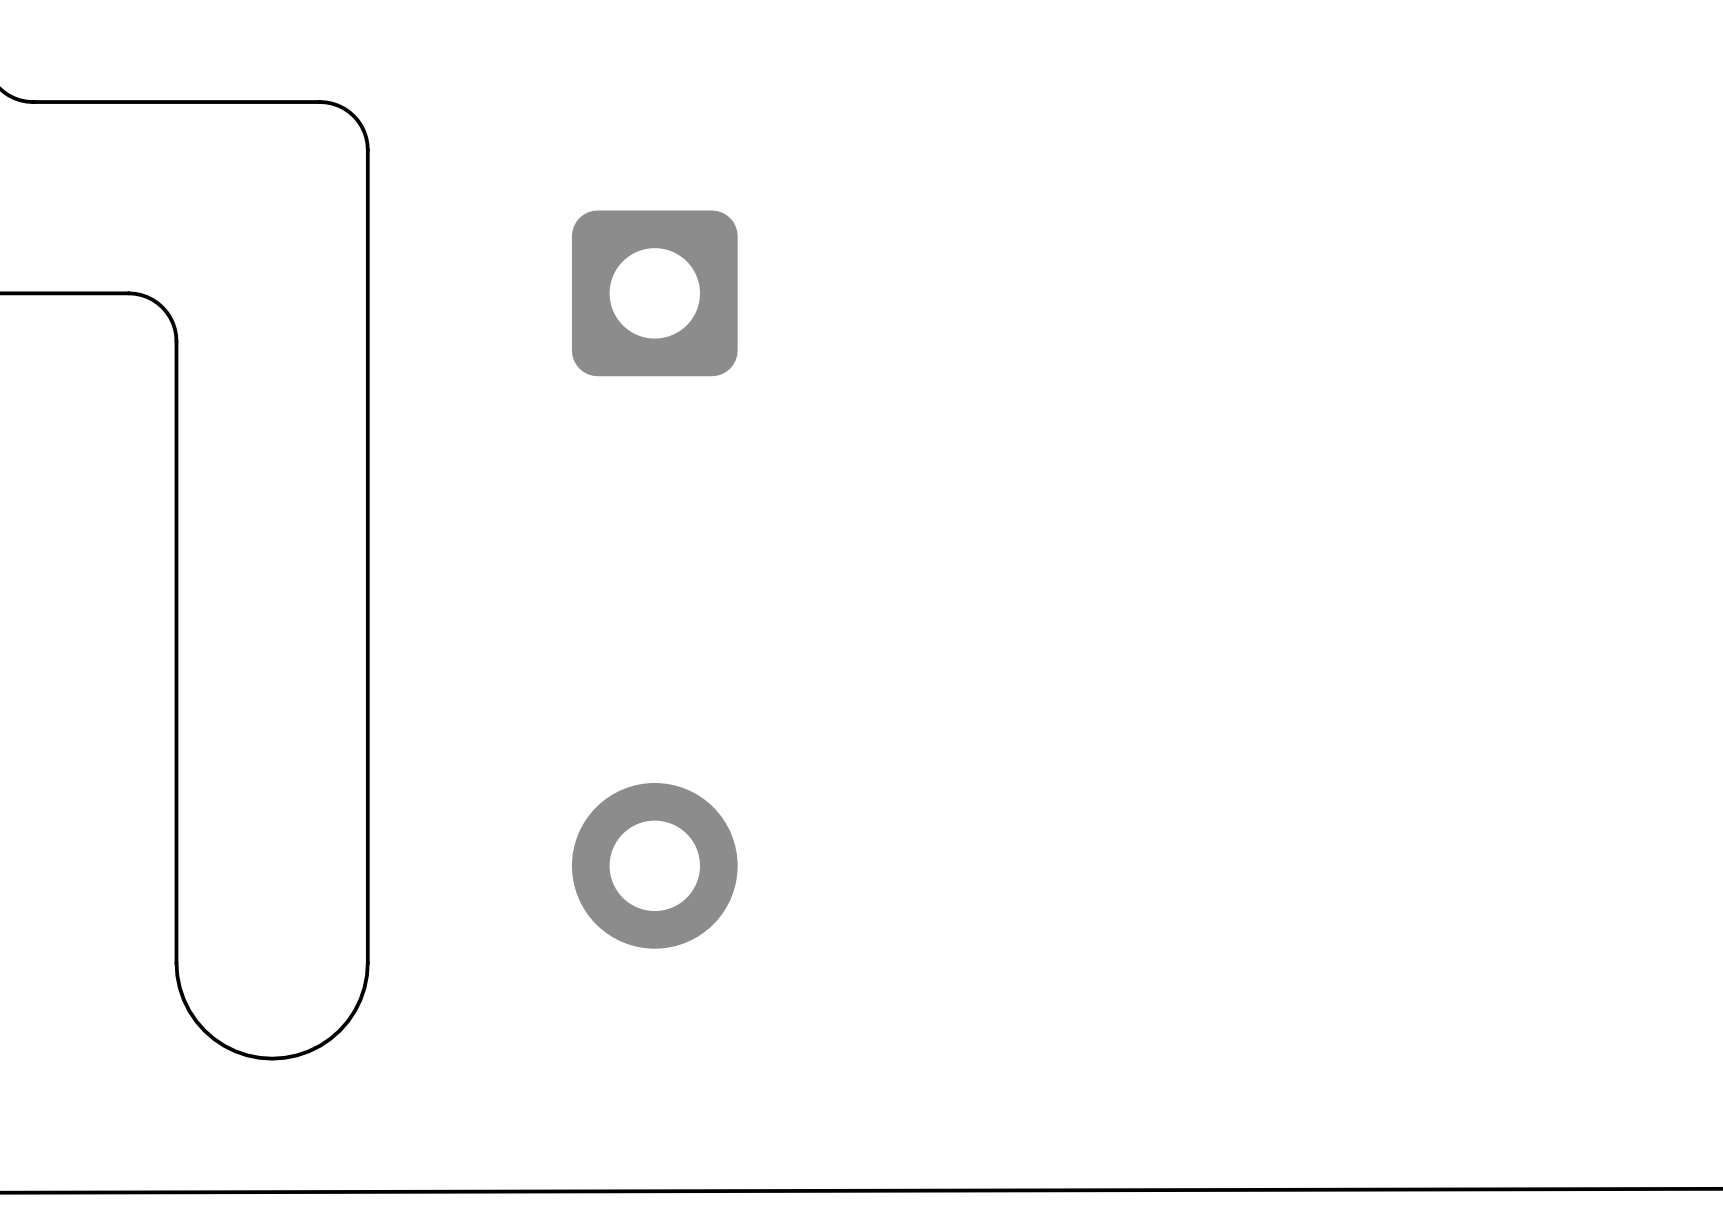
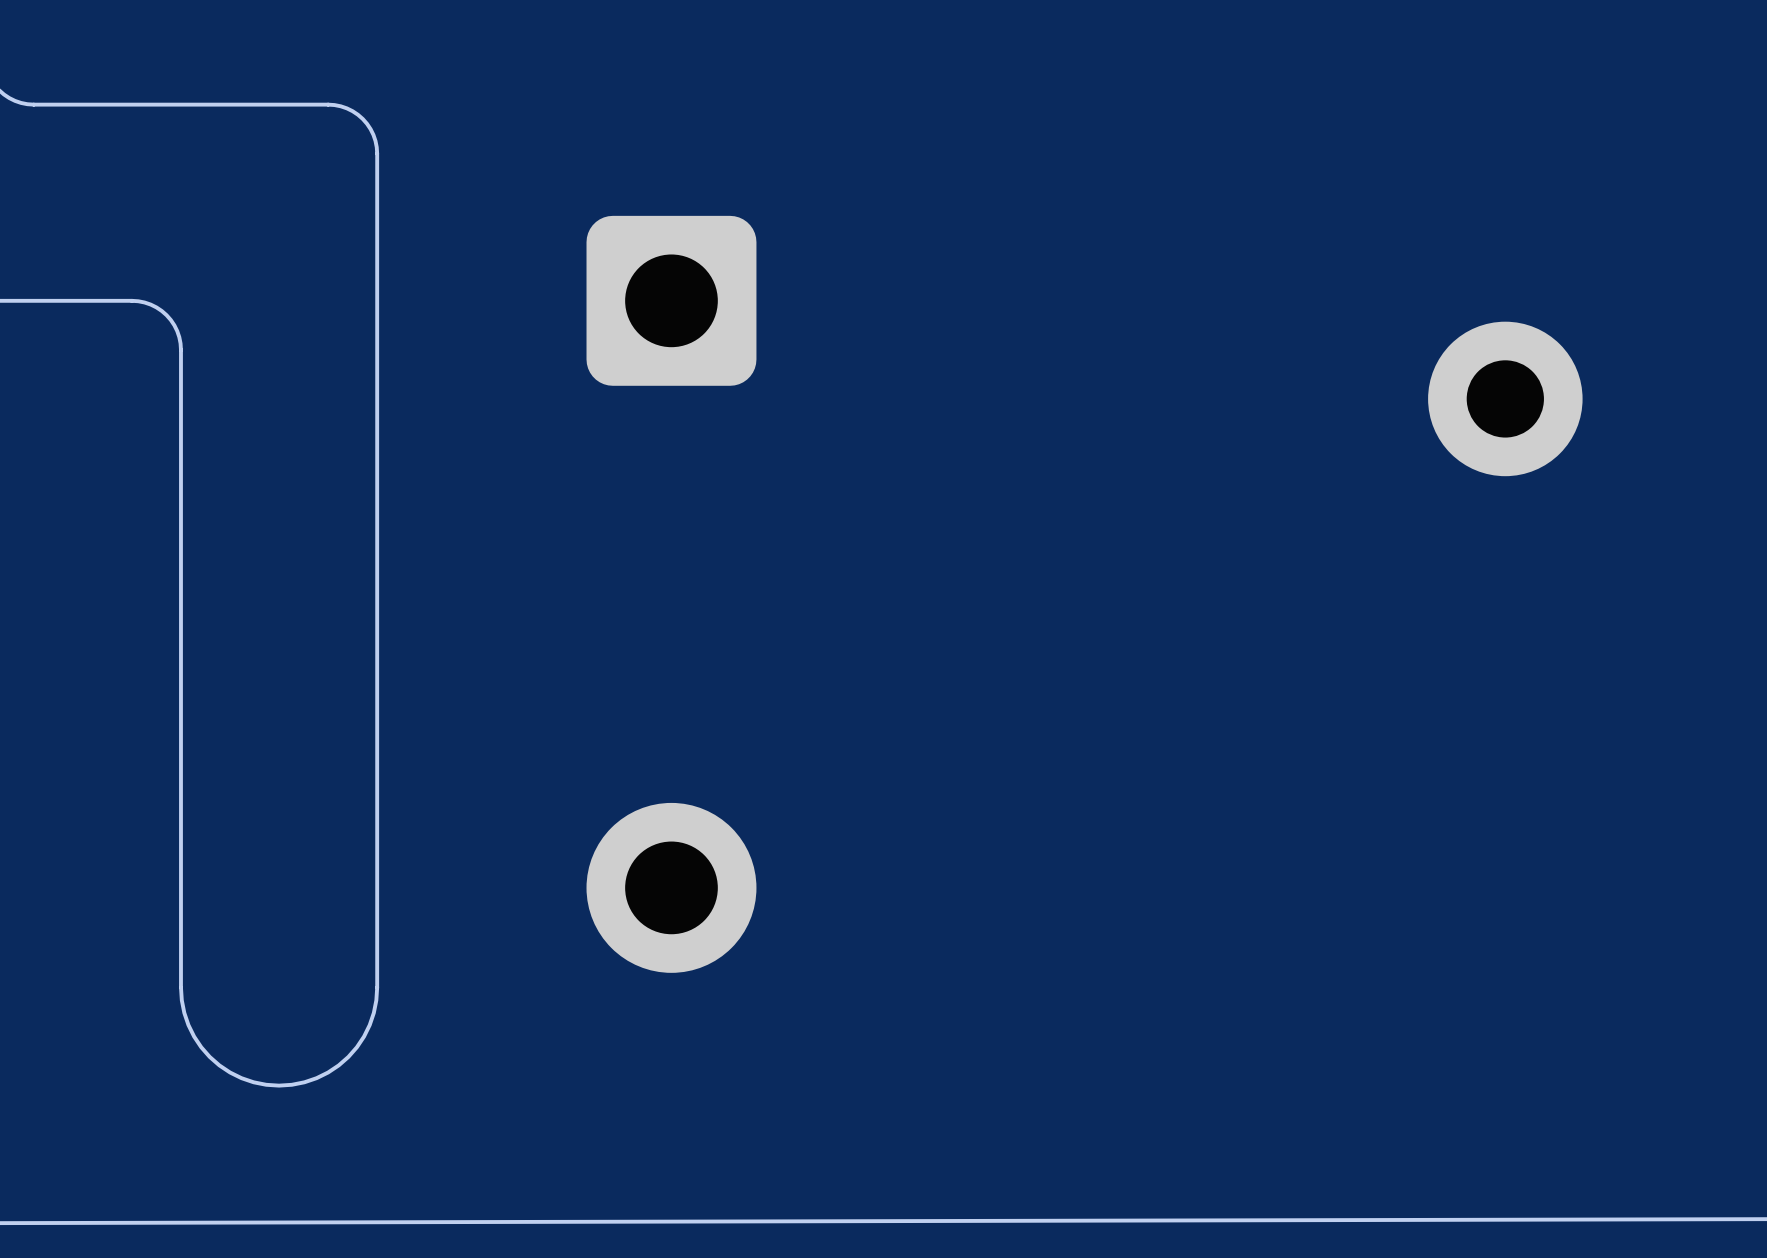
part: none -> (1505, 398)

